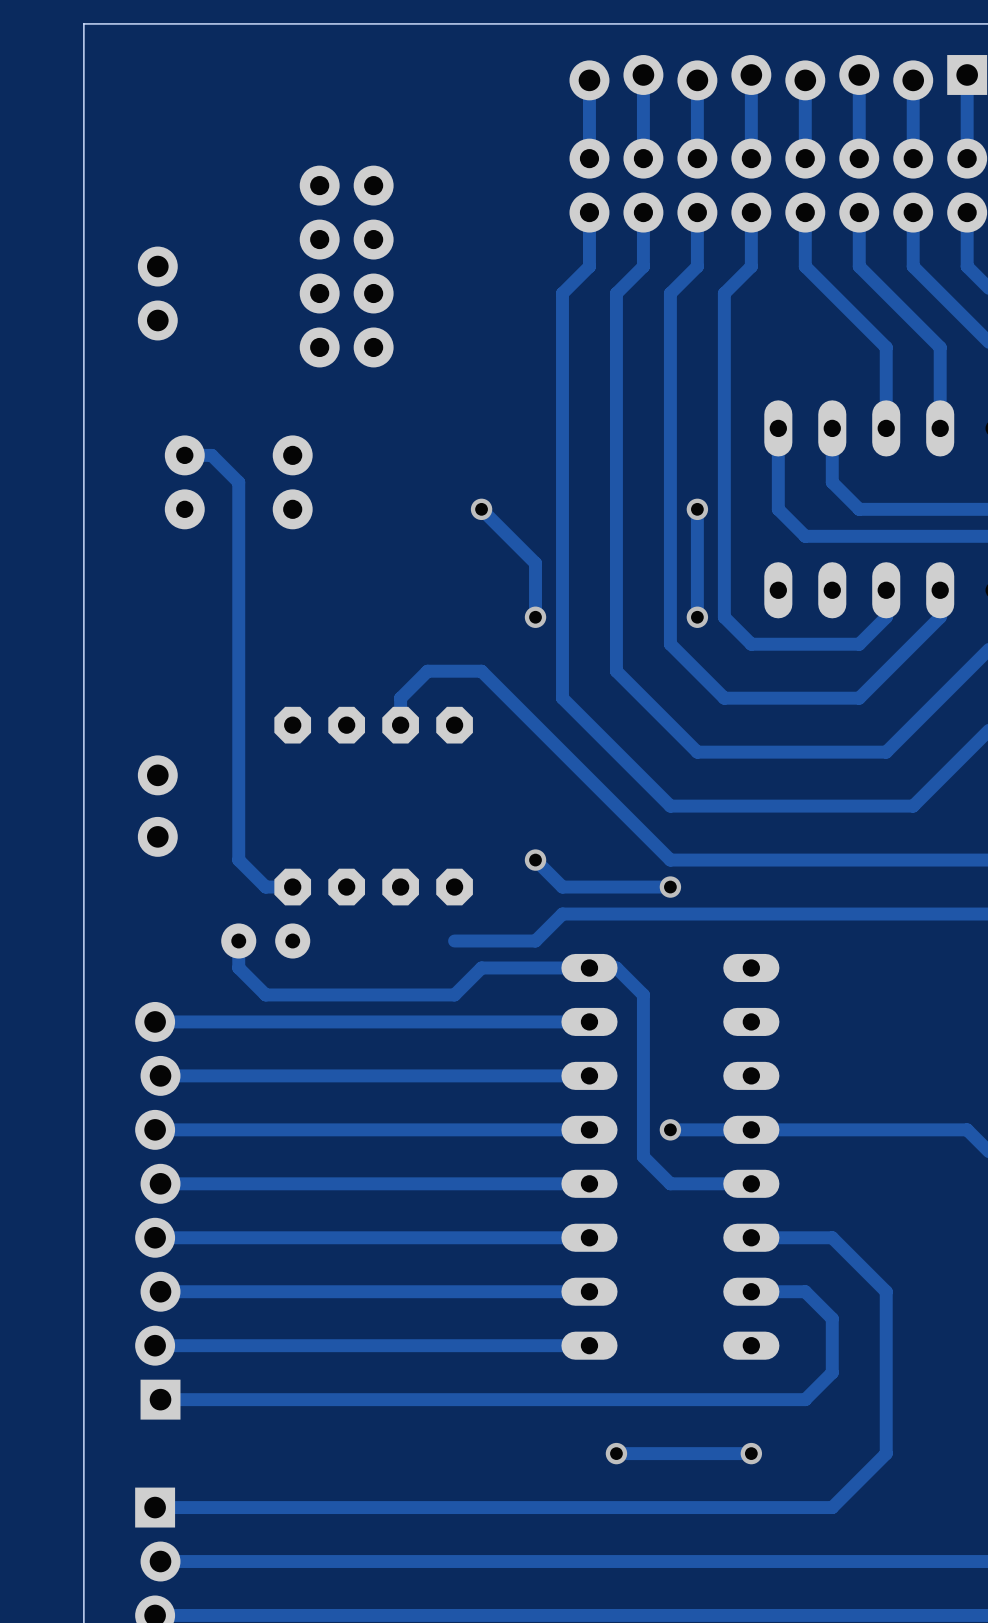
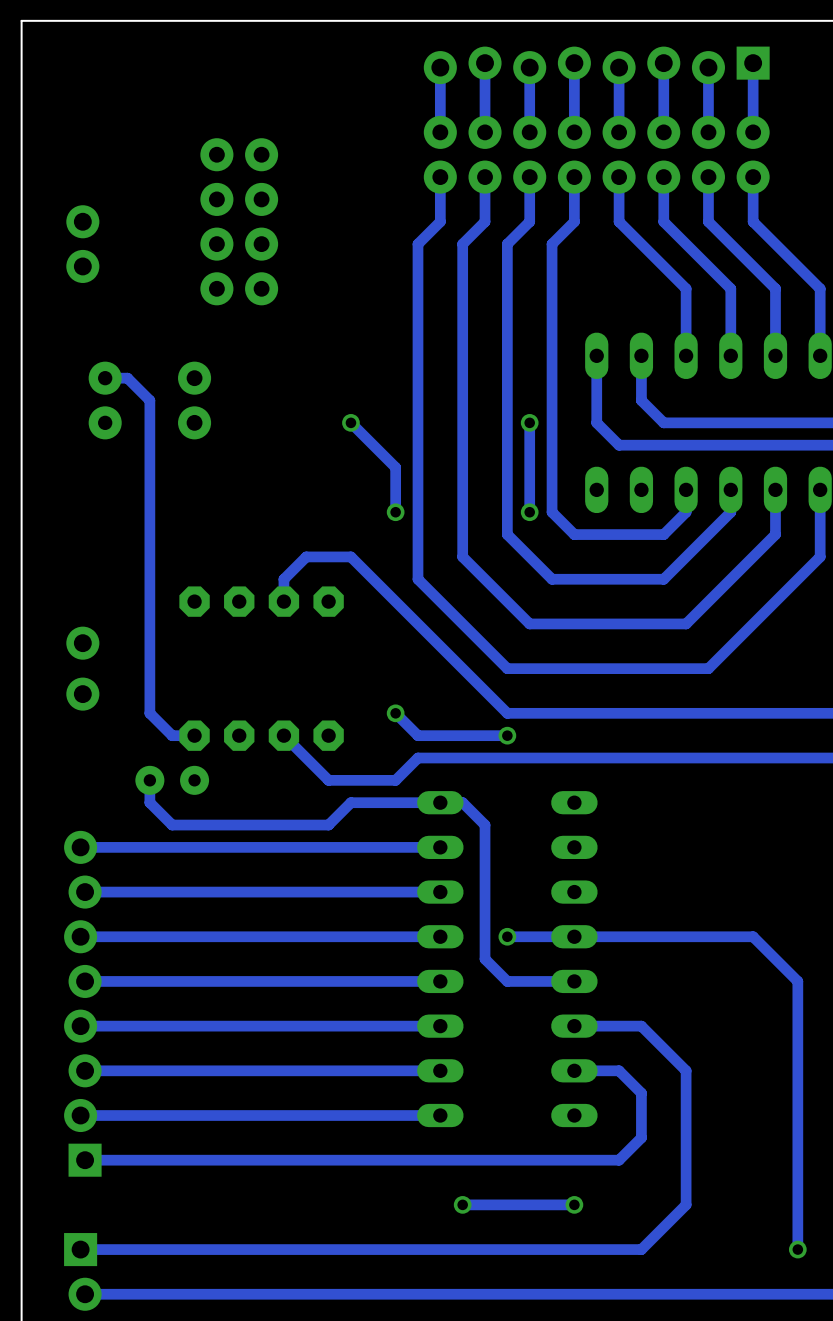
track: none -> (283, 735) (328, 780)

